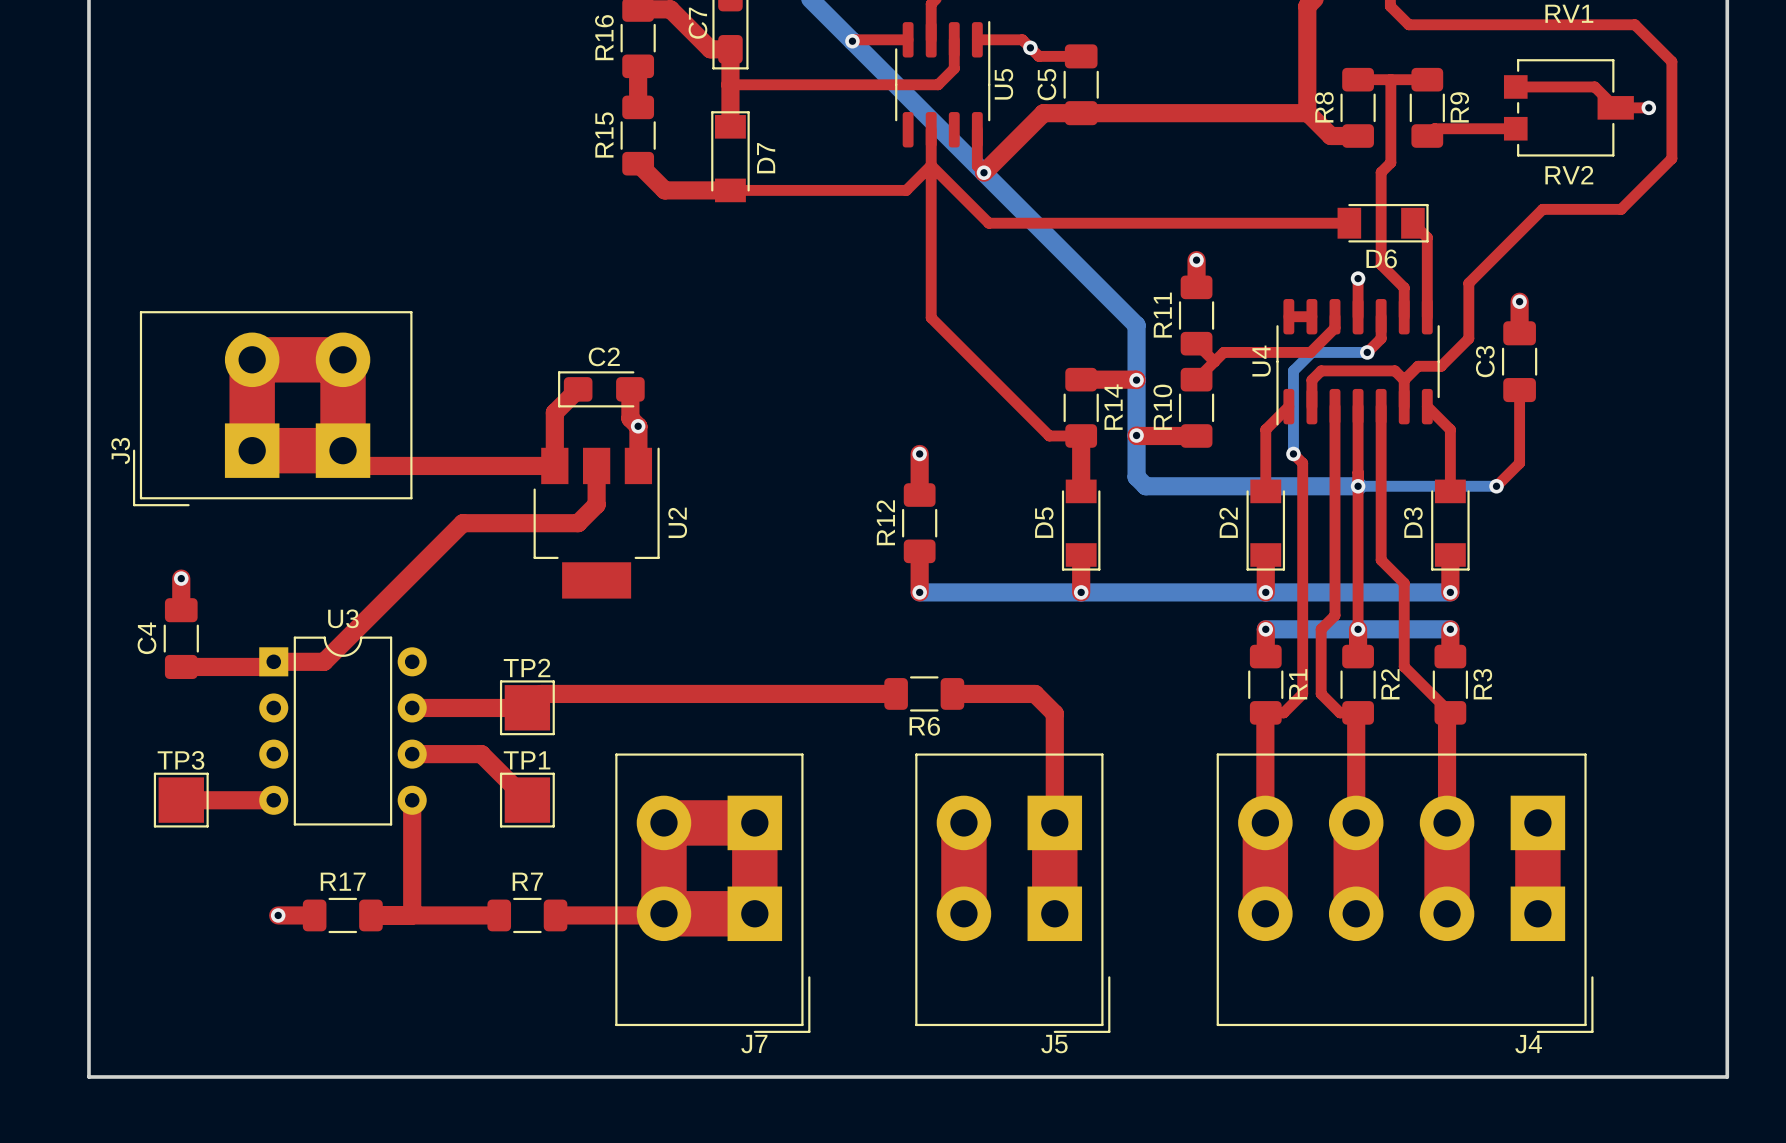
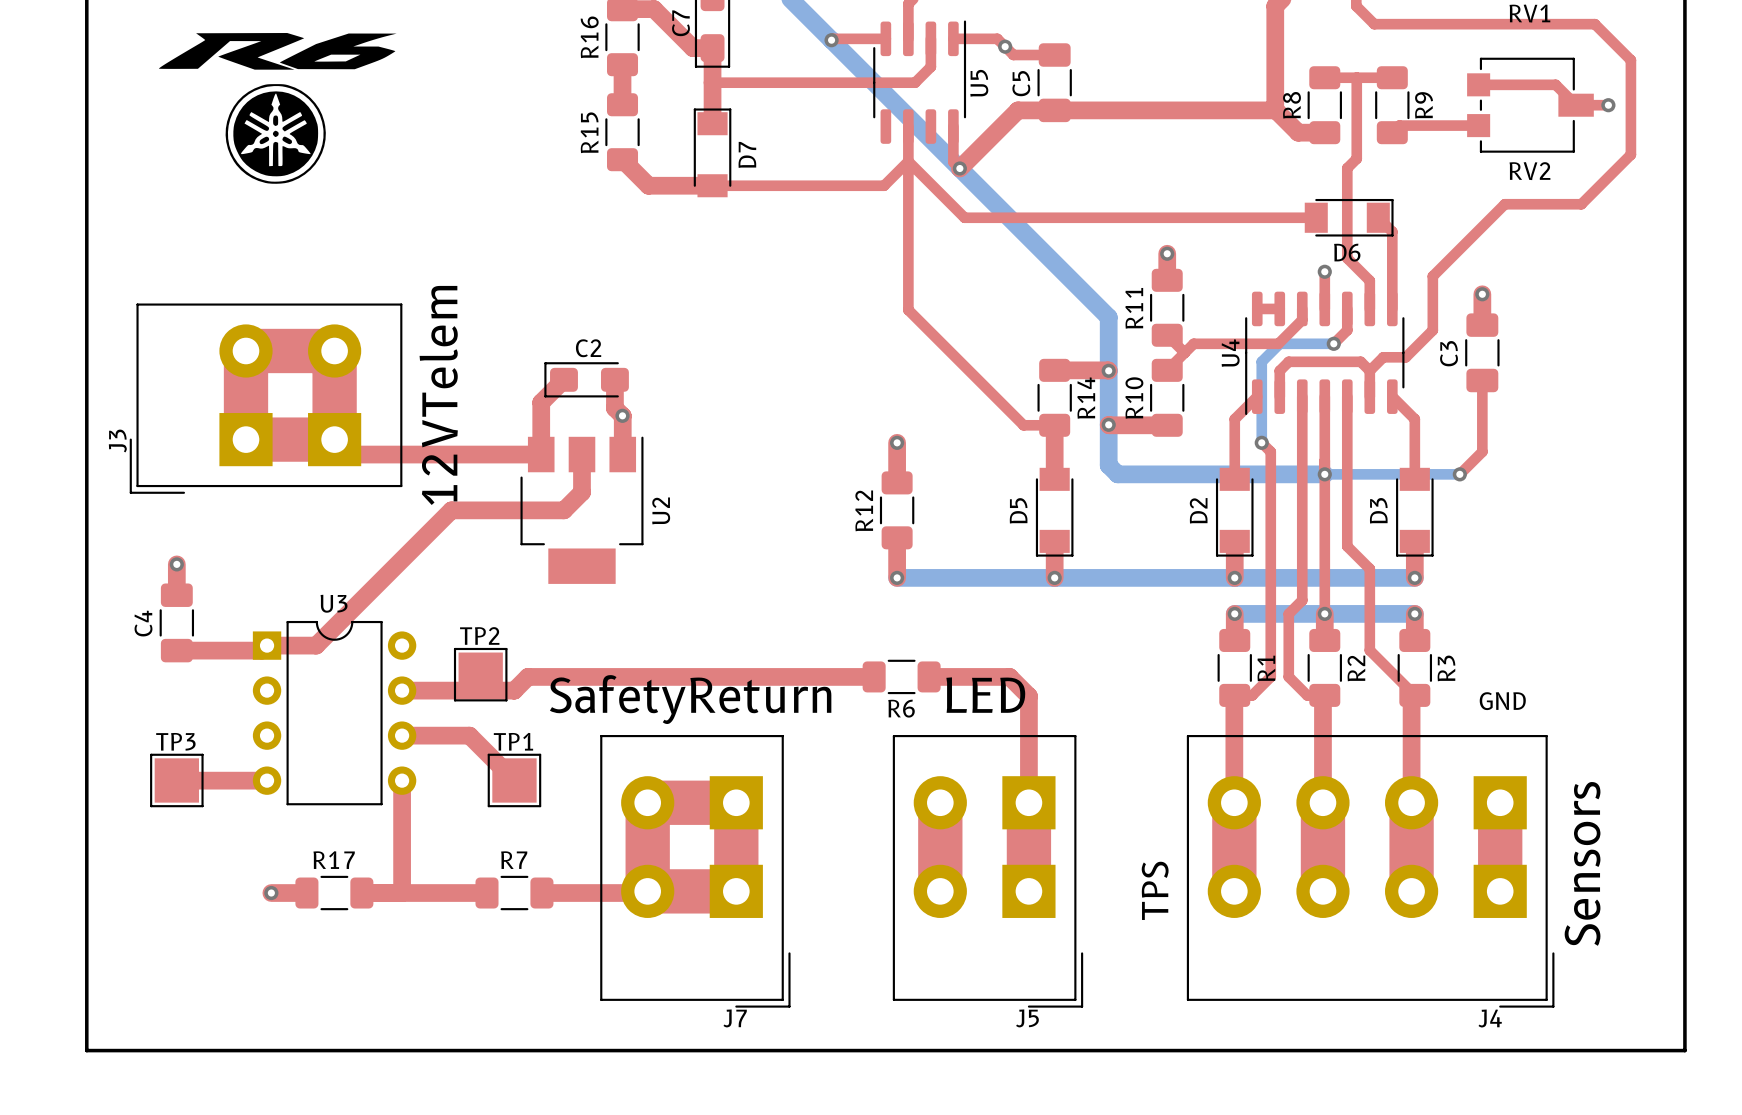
drawing: none -> [158, 33, 397, 184]
J3 value: none -> 12VTelem (438, 395)
TP2 position: (527, 707) -> (480, 674)
J5 value: none -> LED (985, 695)
J7 value: none -> SafetyReturn (690, 699)
text: none -> GND (1502, 701)
J4 value: none -> Sensors (1582, 863)
text: none -> TPS (1155, 890)

